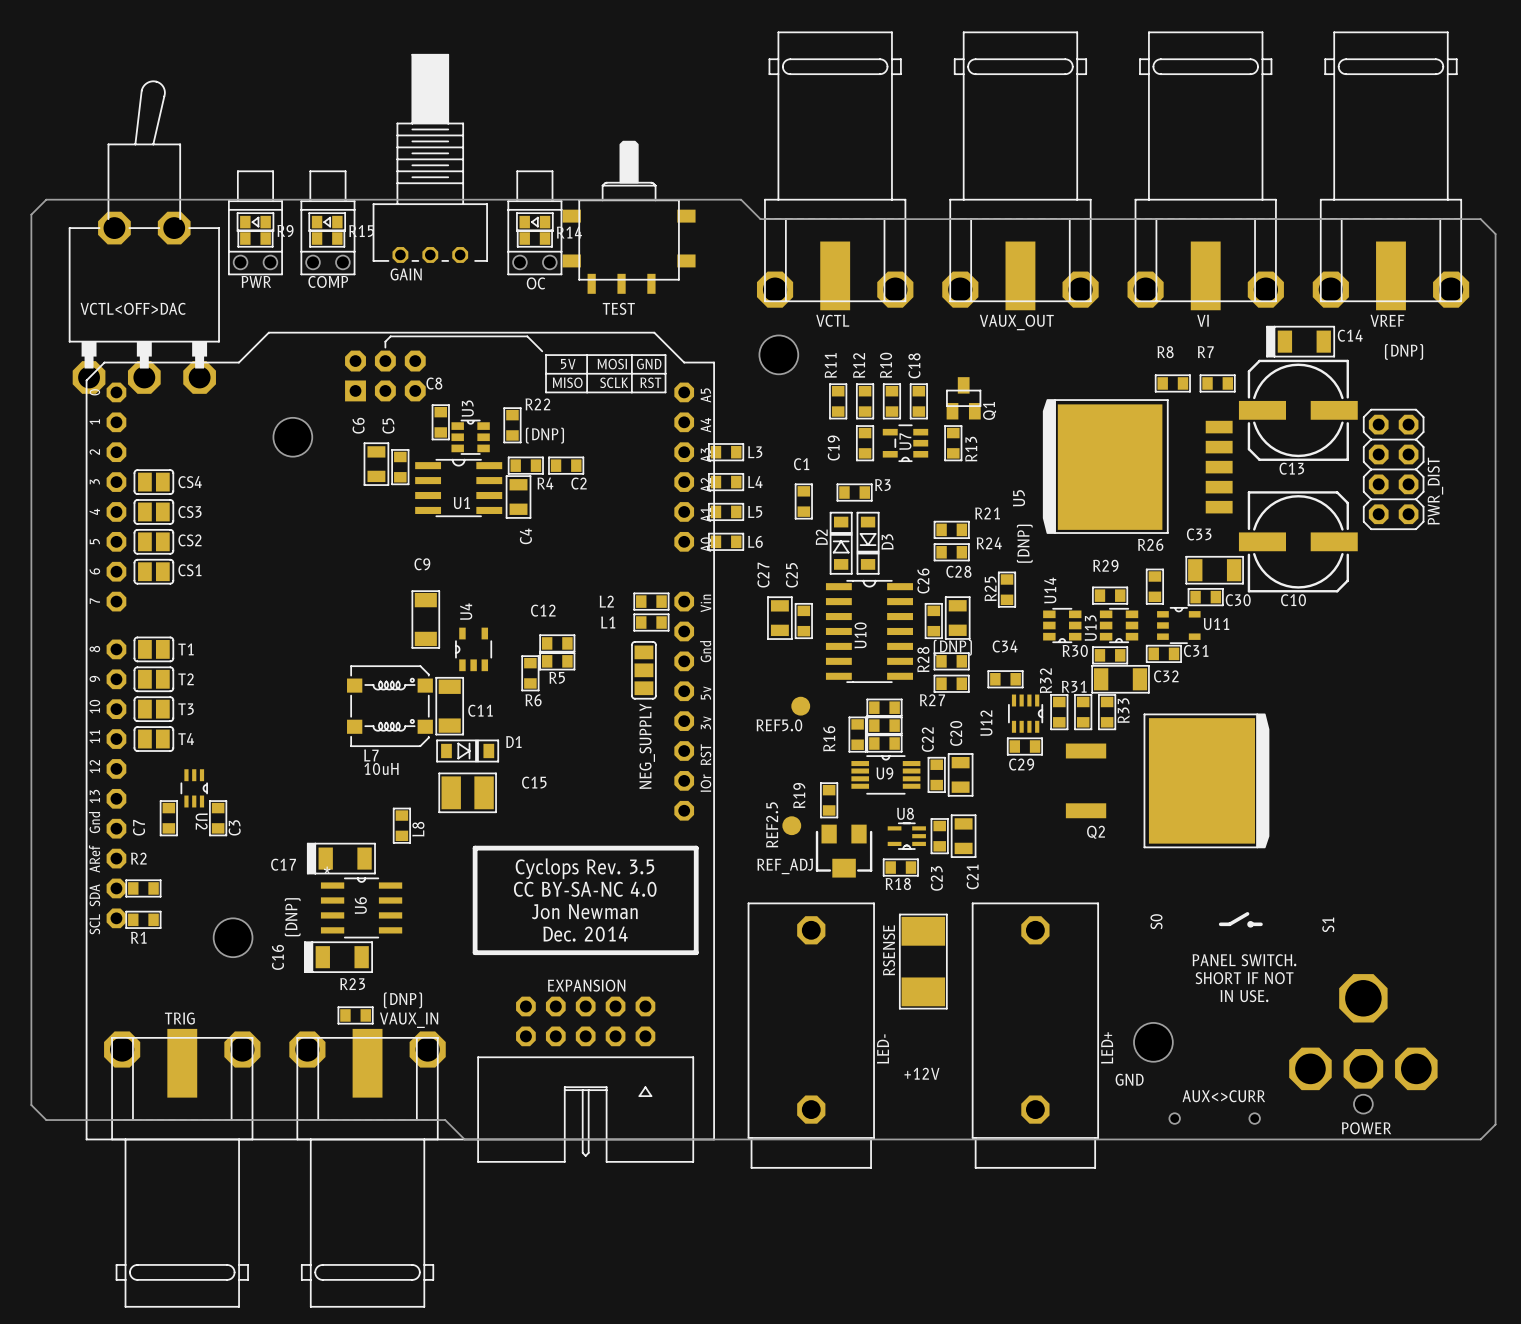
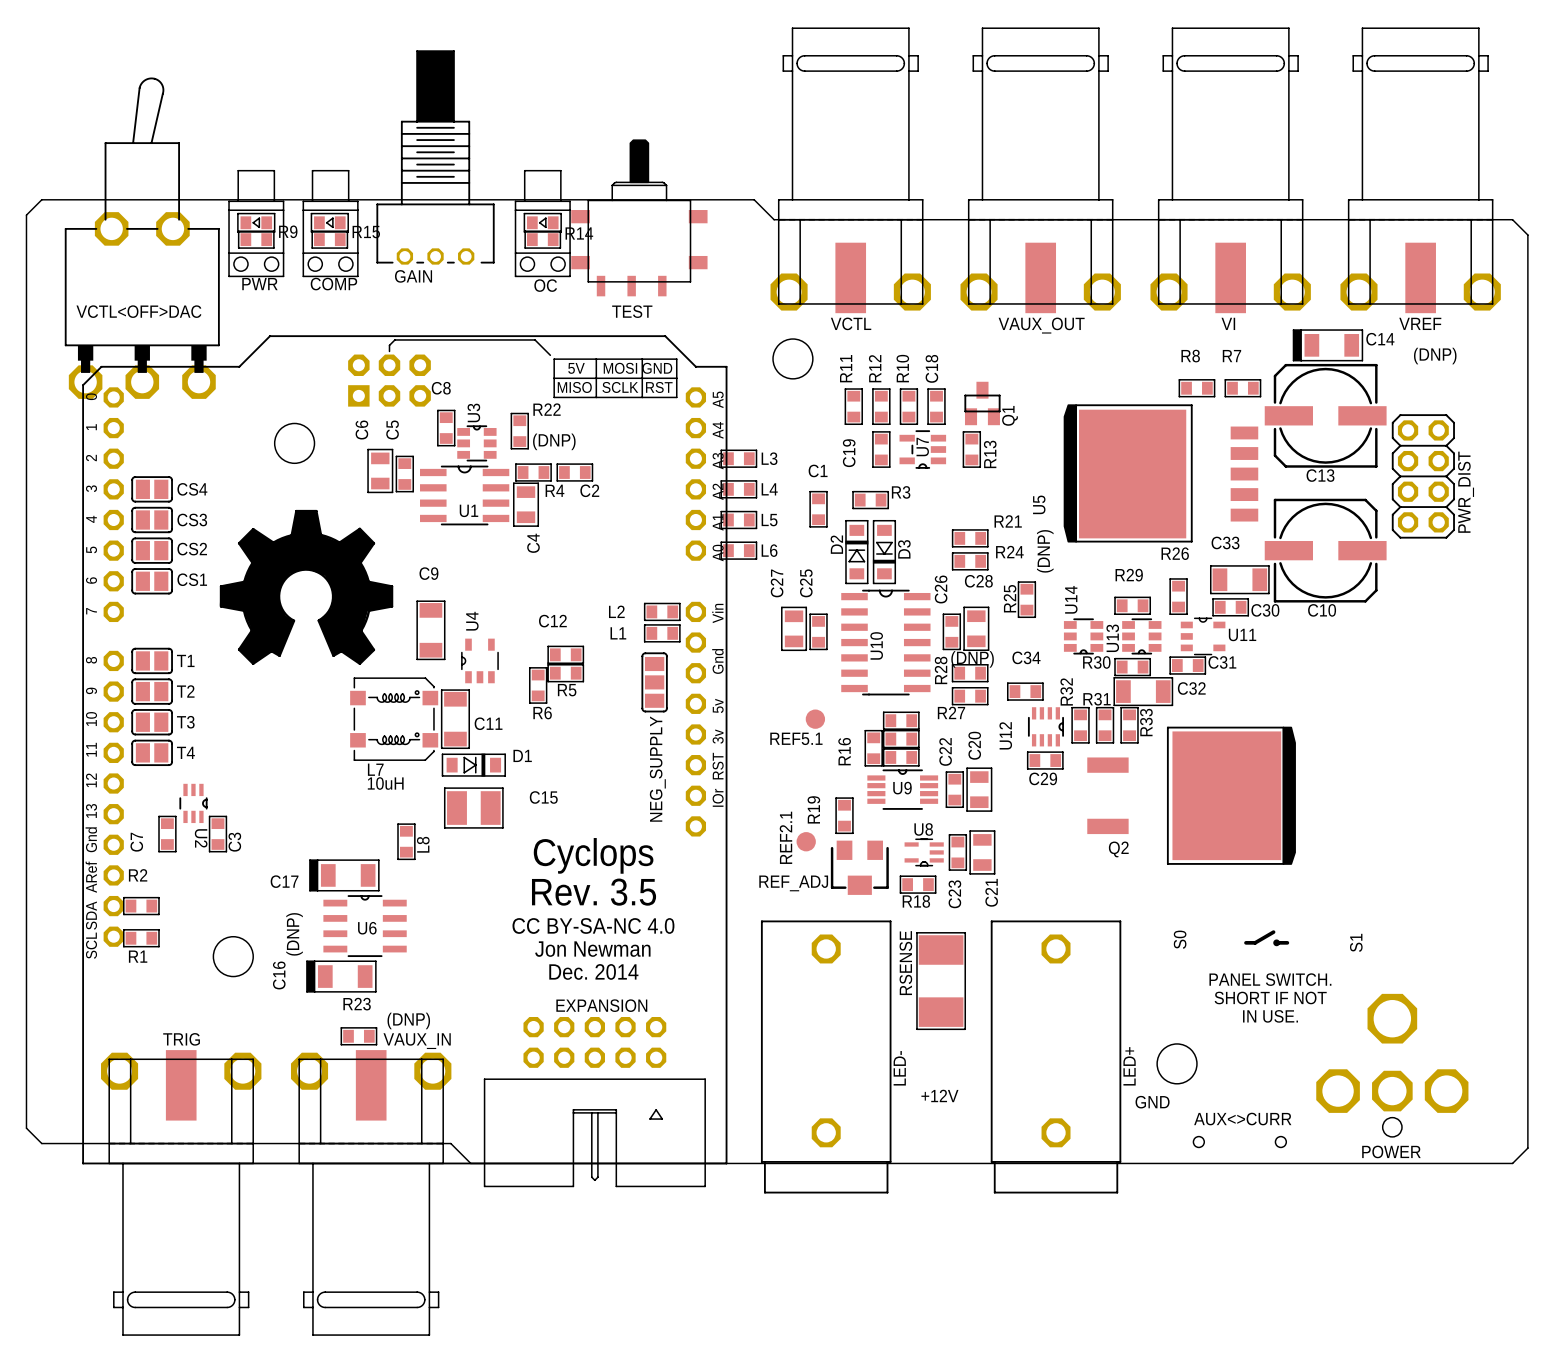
drawing: none -> [219, 509, 394, 665]
REF5.0 name: REF5.0 (779, 725) -> REF5.1 (796, 738)
REF2.5 name: REF2.5 (772, 824) -> REF2.1 (785, 837)
text: none -> Cyclops (593, 855)
line: (475, 848) (475, 952) (696, 952) (696, 848) (475, 848) -> none
text: Cyclops Rev. 3.5 (584, 868) -> Rev. 3.5 (594, 892)
U6 footprint: [320, 877, 403, 939] -> [323, 895, 407, 958]
text: CC BY-SA-NC 4.0 (585, 889) -> none
text: Jon Newman (584, 911) -> CC BY-SA-NC 4.0 (593, 925)
text: Dec. 2014 (585, 934) -> Jon Newman (592, 949)
text: none -> Dec. 2014 (593, 971)

